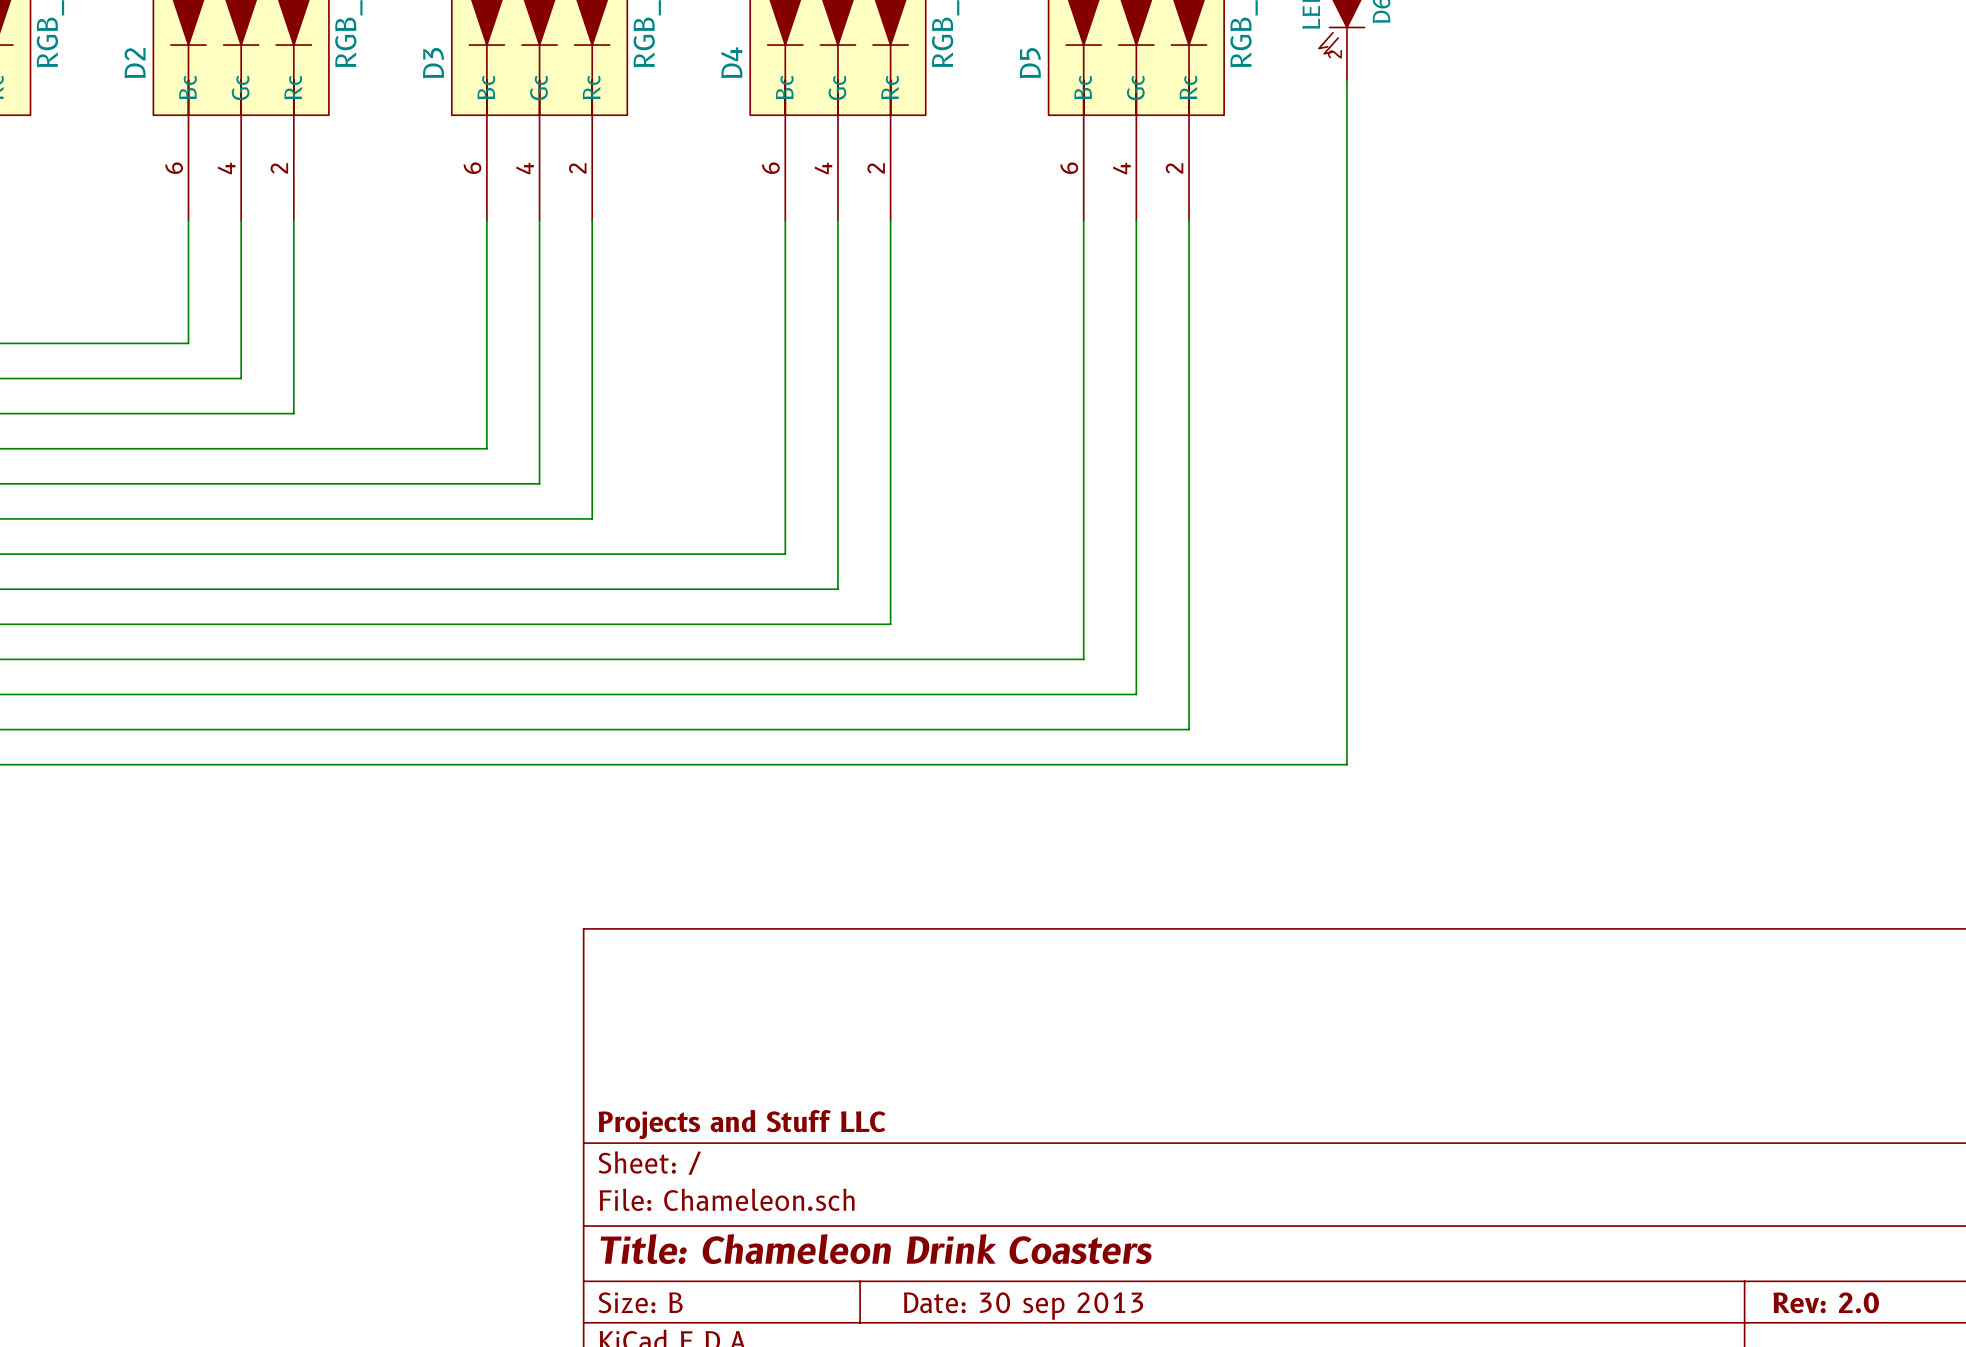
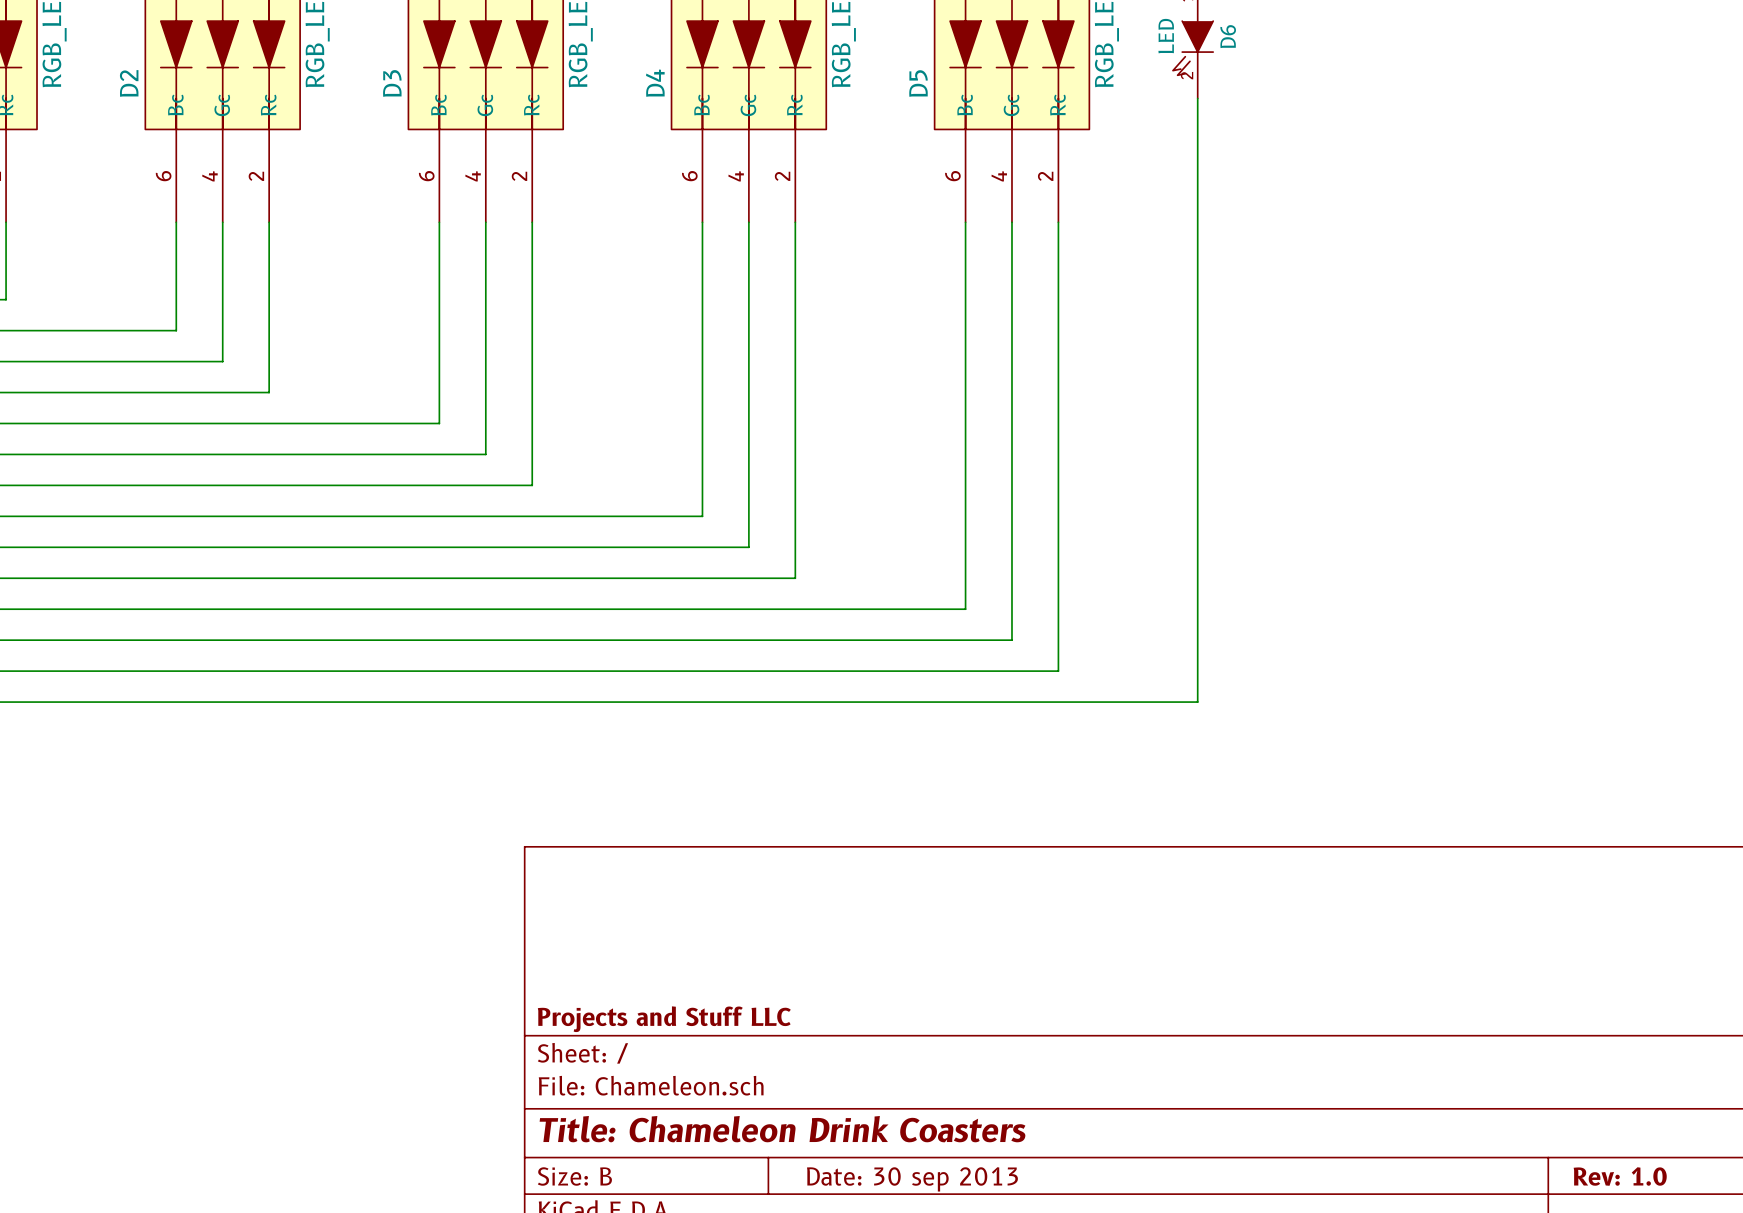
title block: Rev: 2.0 (1826, 1302) -> Rev: 1.0 (1620, 1176)

